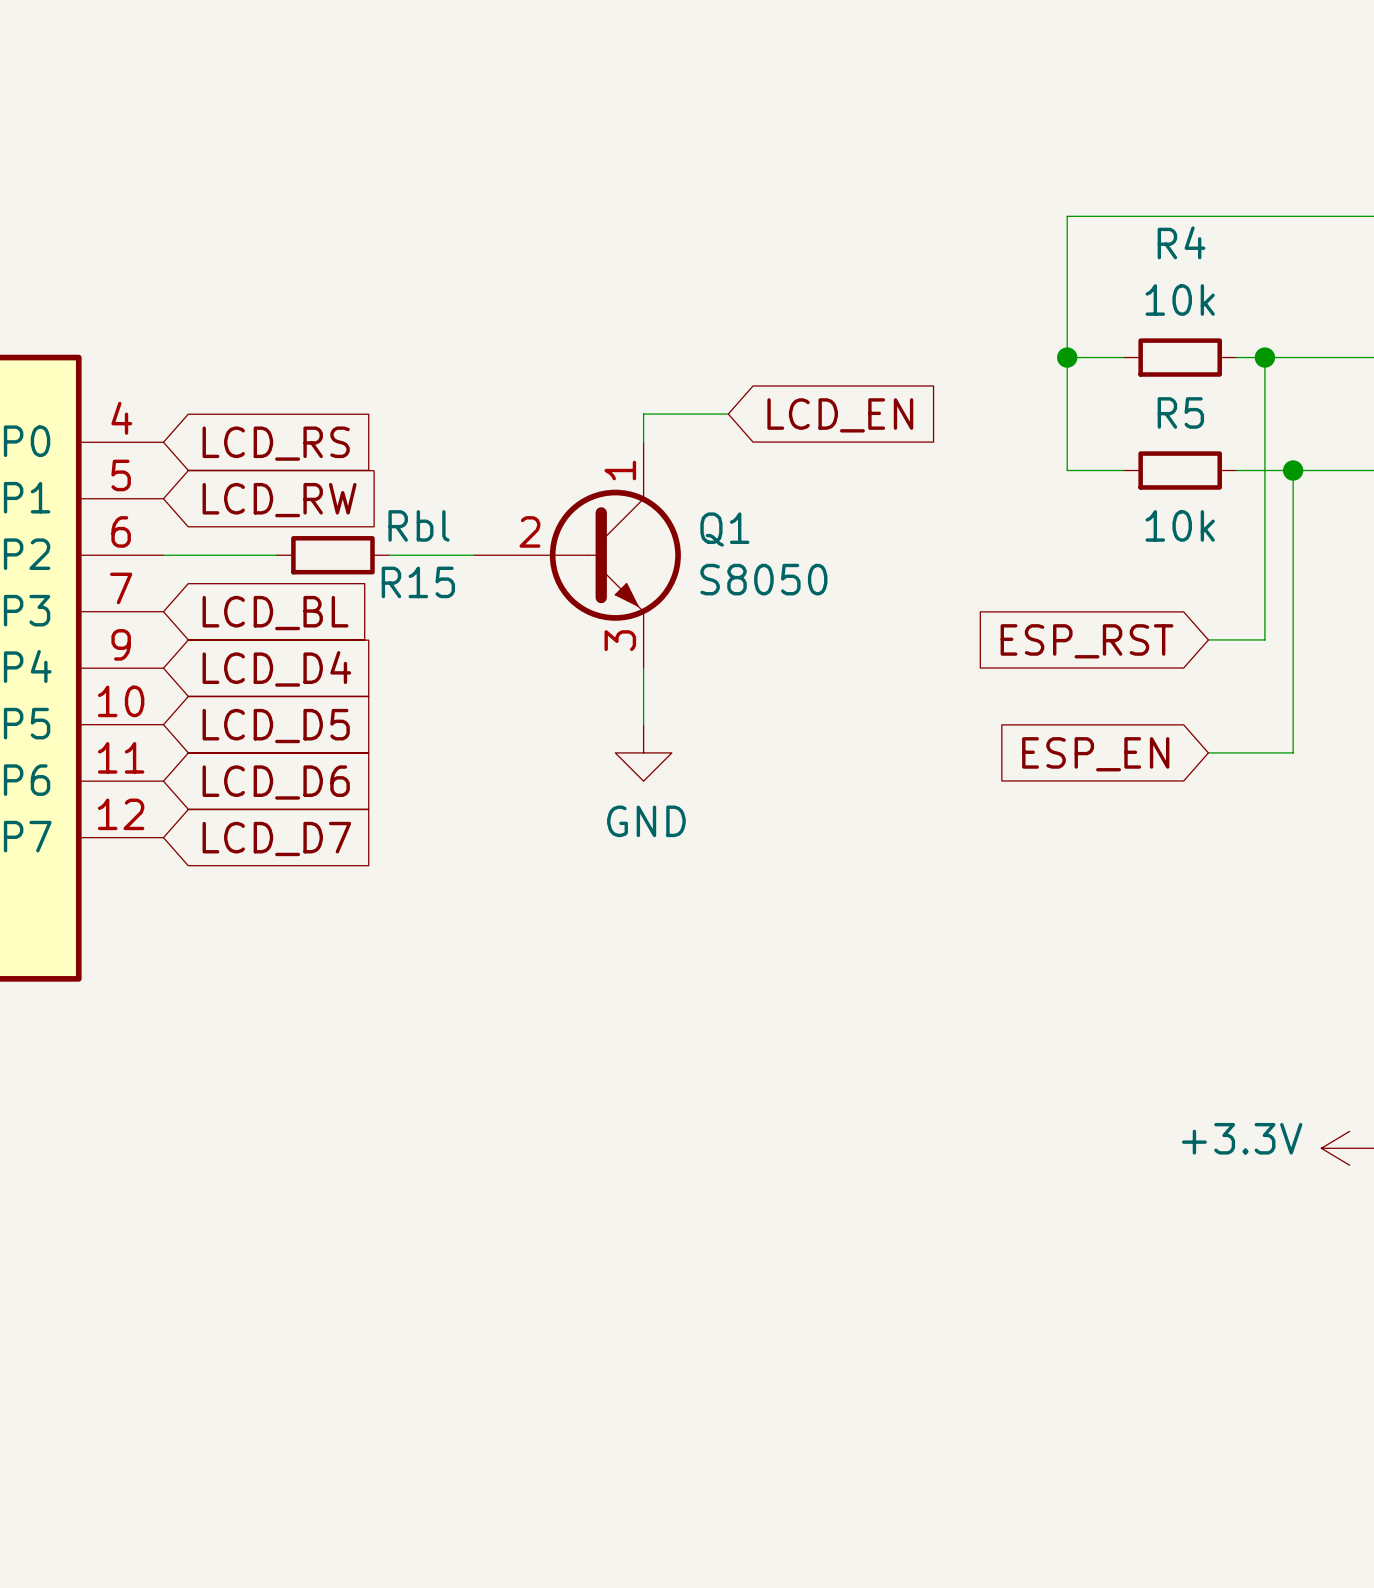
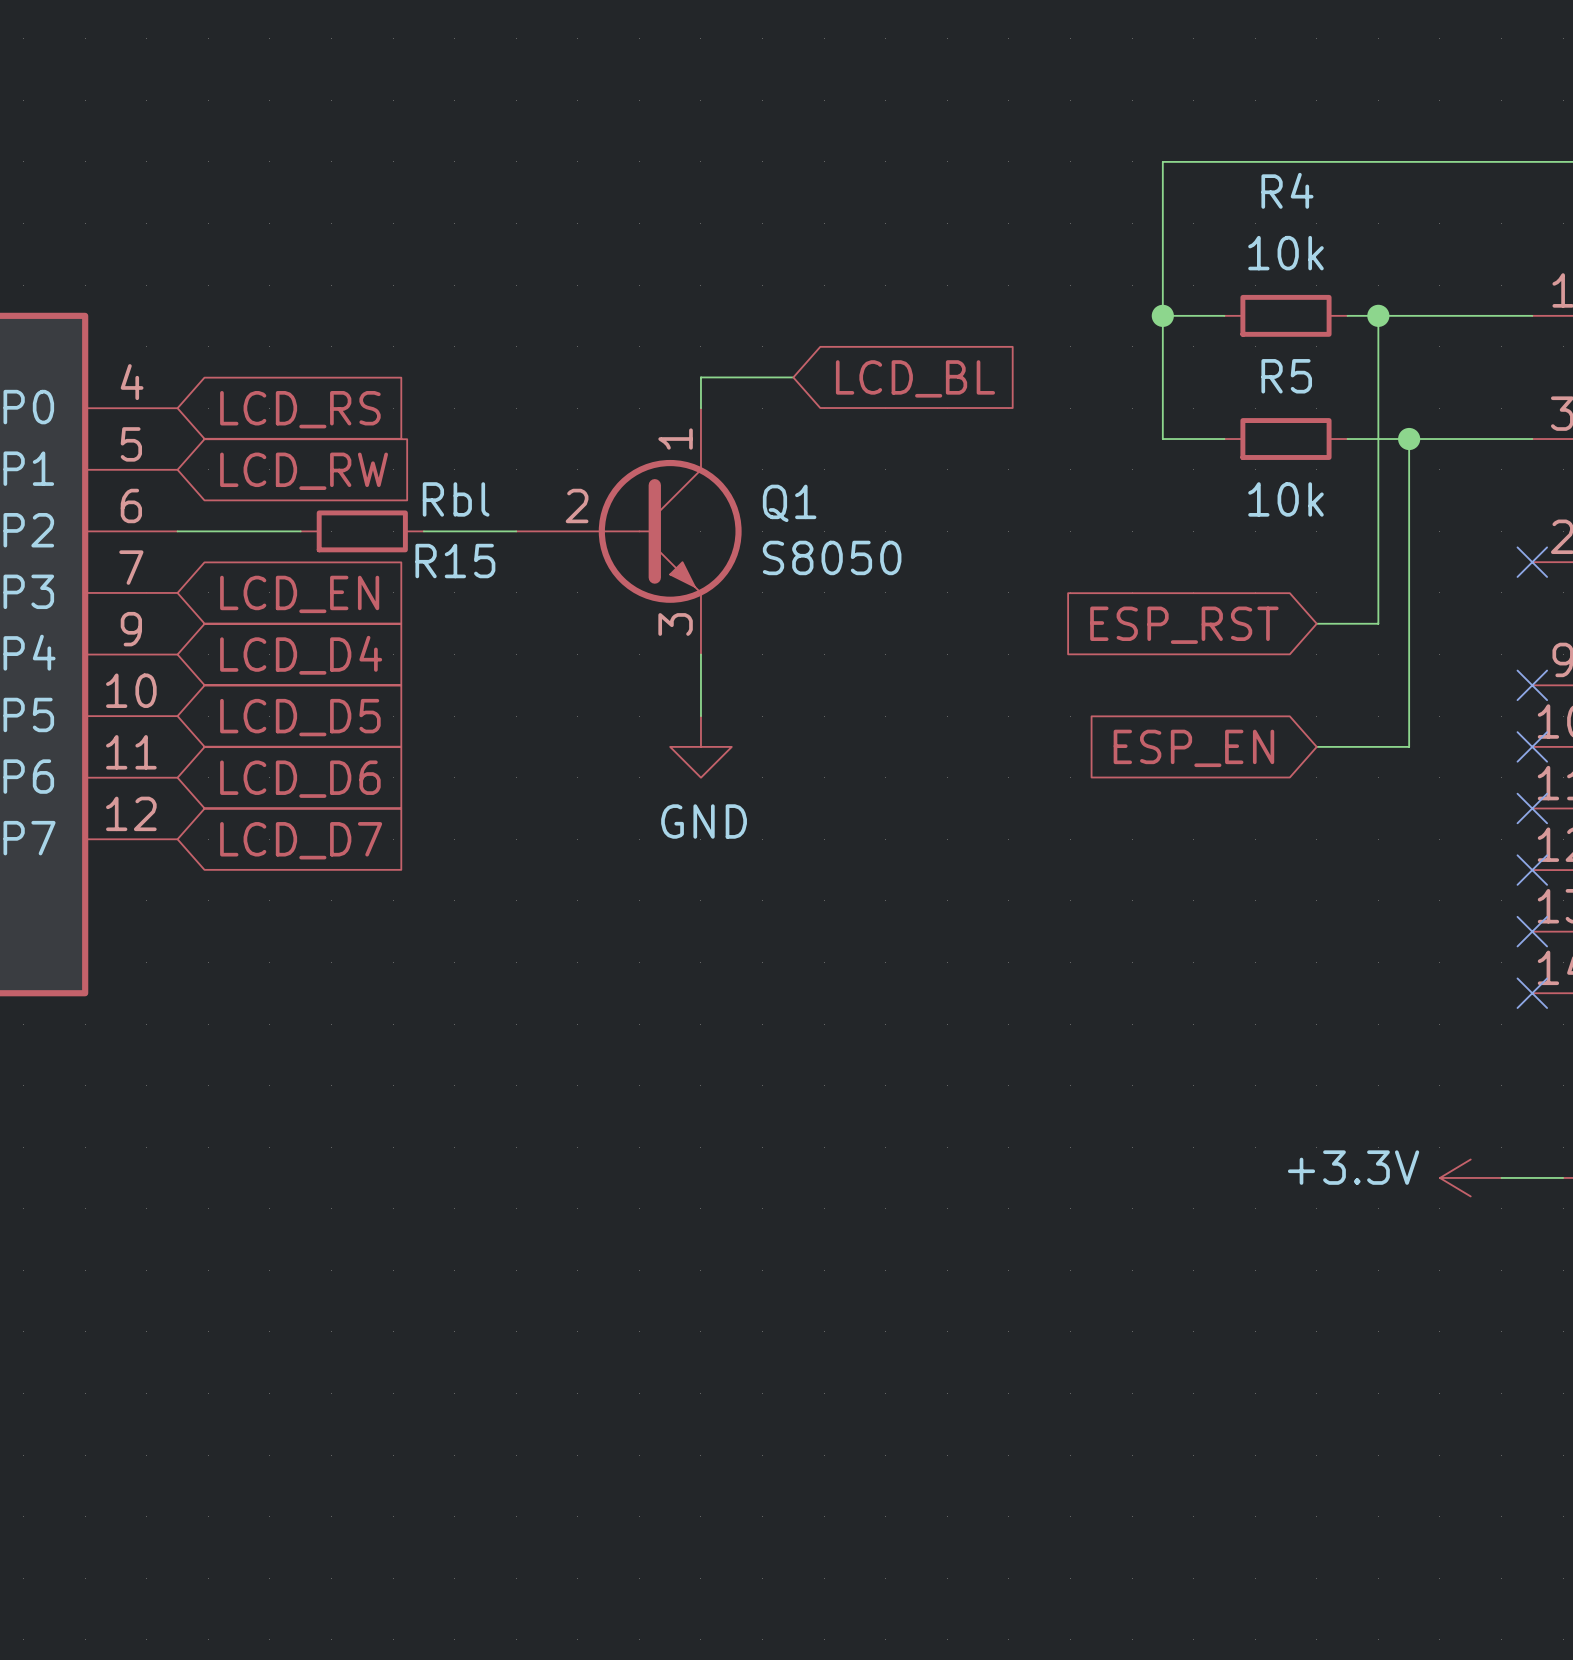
global label: LCD_EN (840, 415) -> LCD_BL (915, 378)
global label: LCD_BL (275, 613) -> LCD_EN (299, 594)

